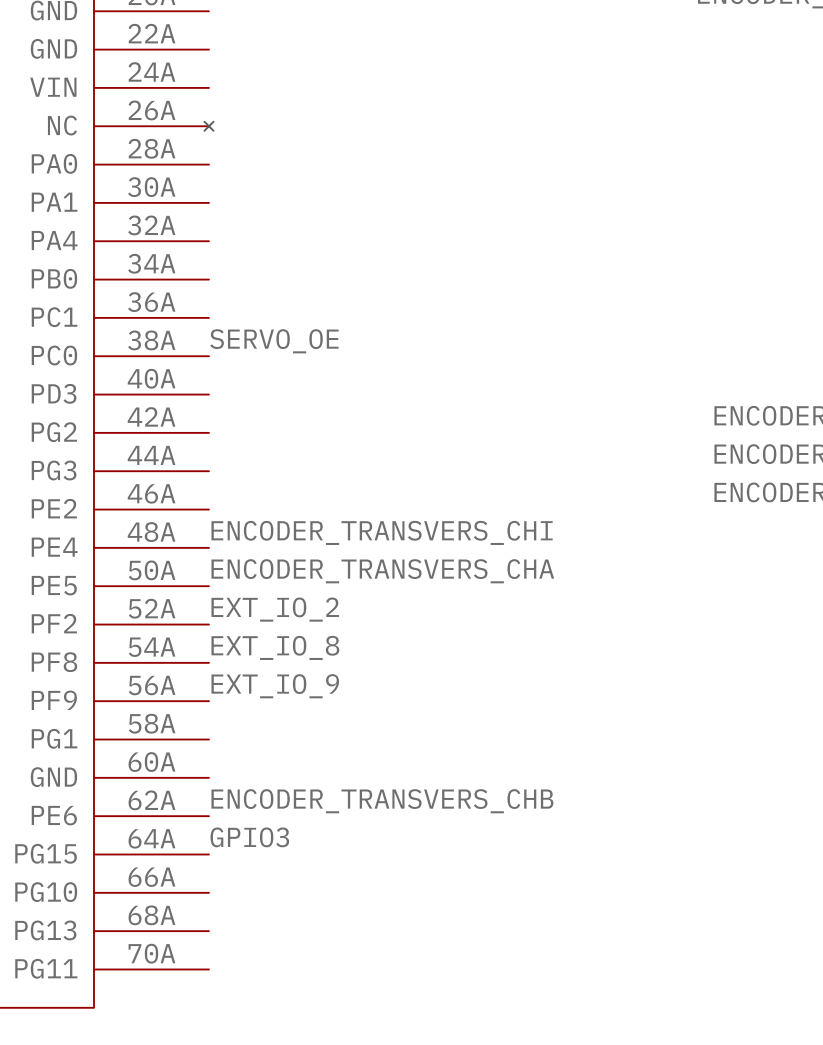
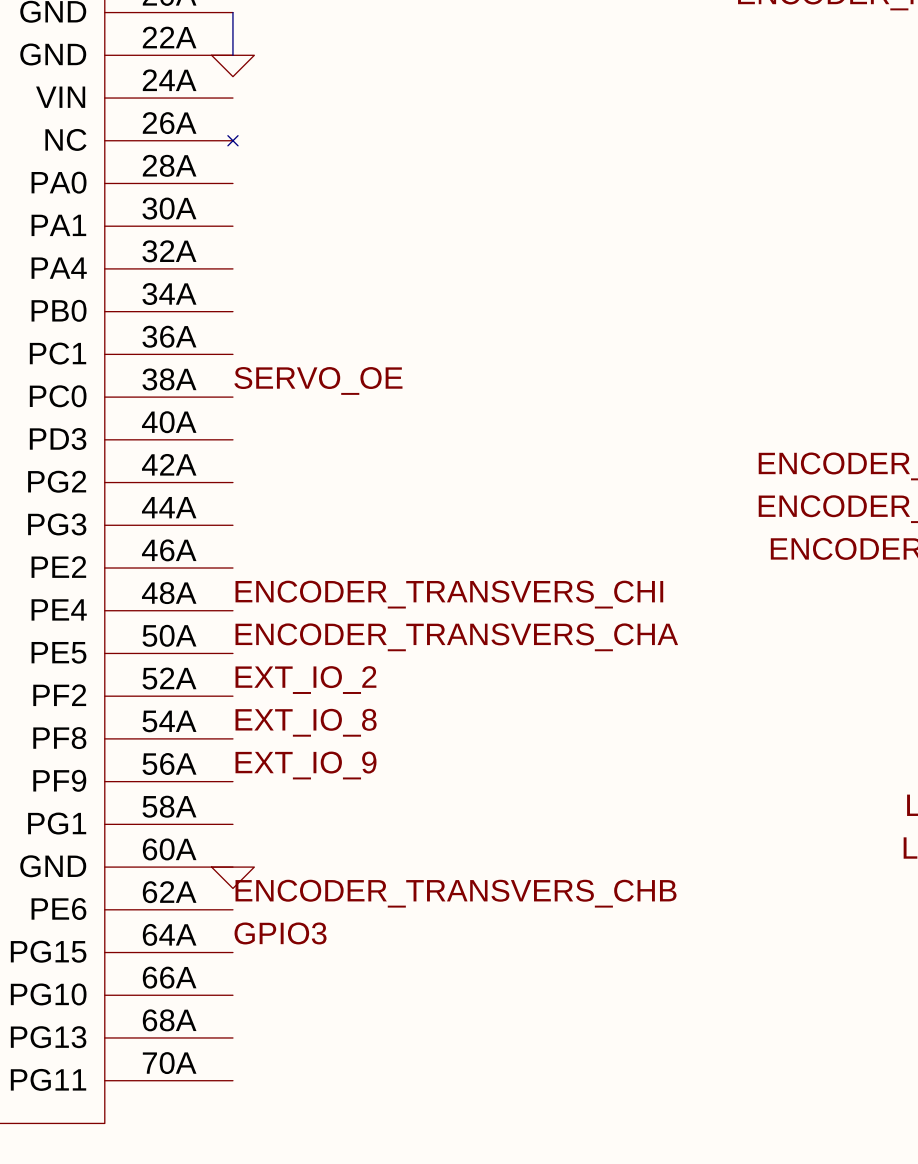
wire: none -> (232, 12) (232, 55)
power symbol: none -> (232, 65)
power symbol: none -> (232, 877)

